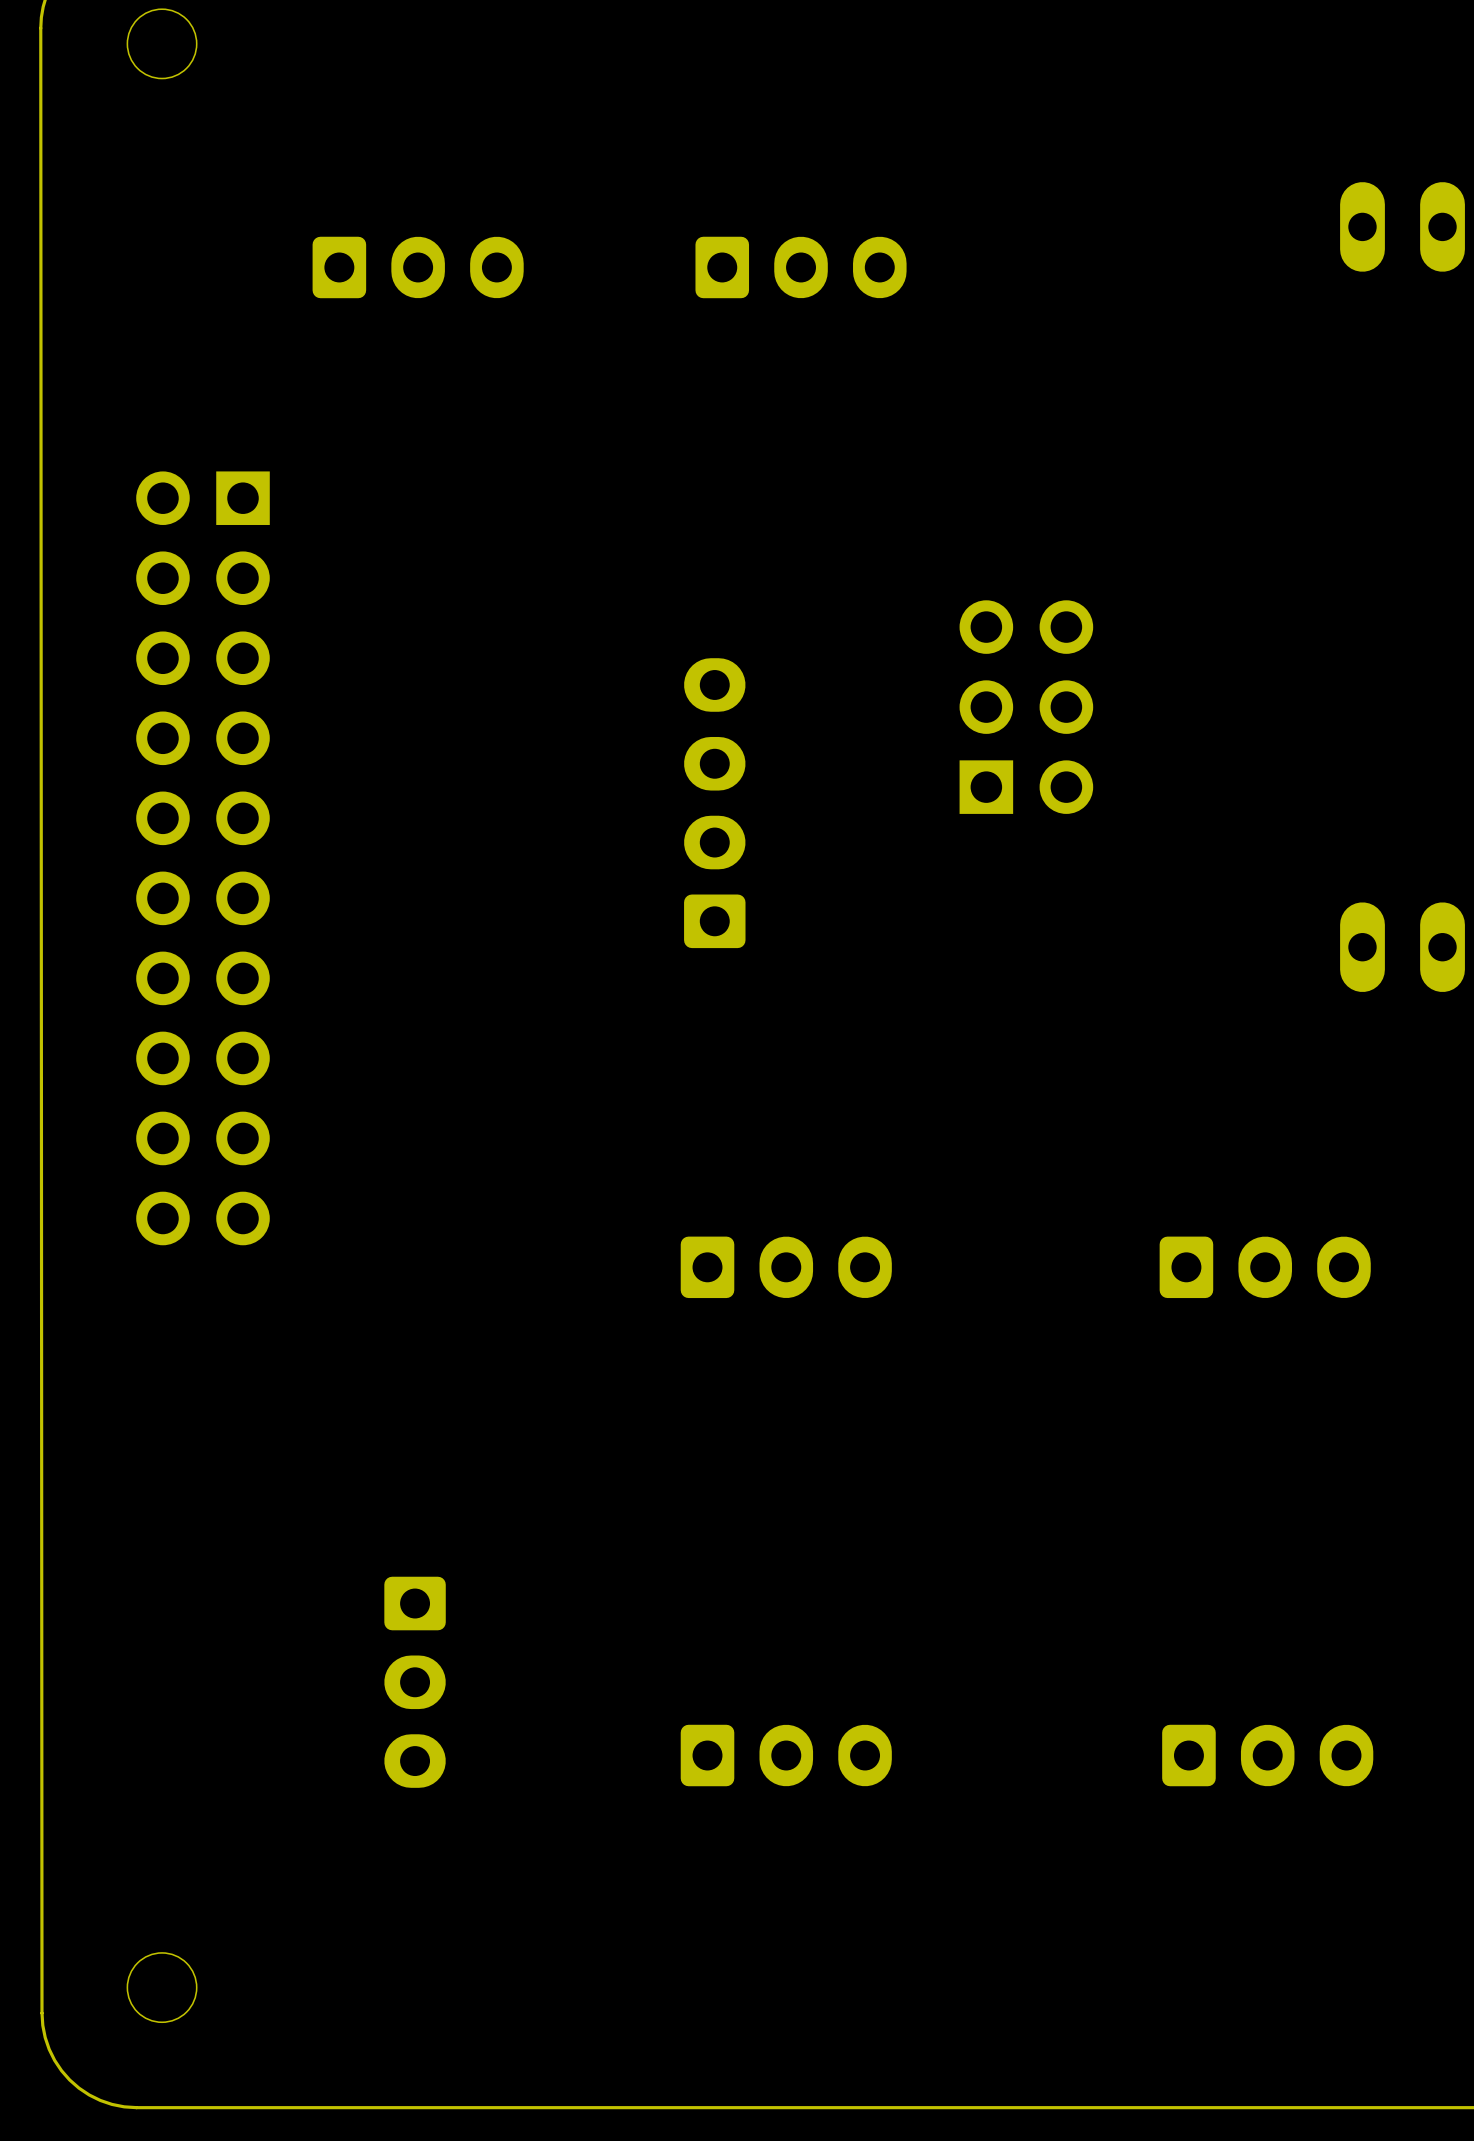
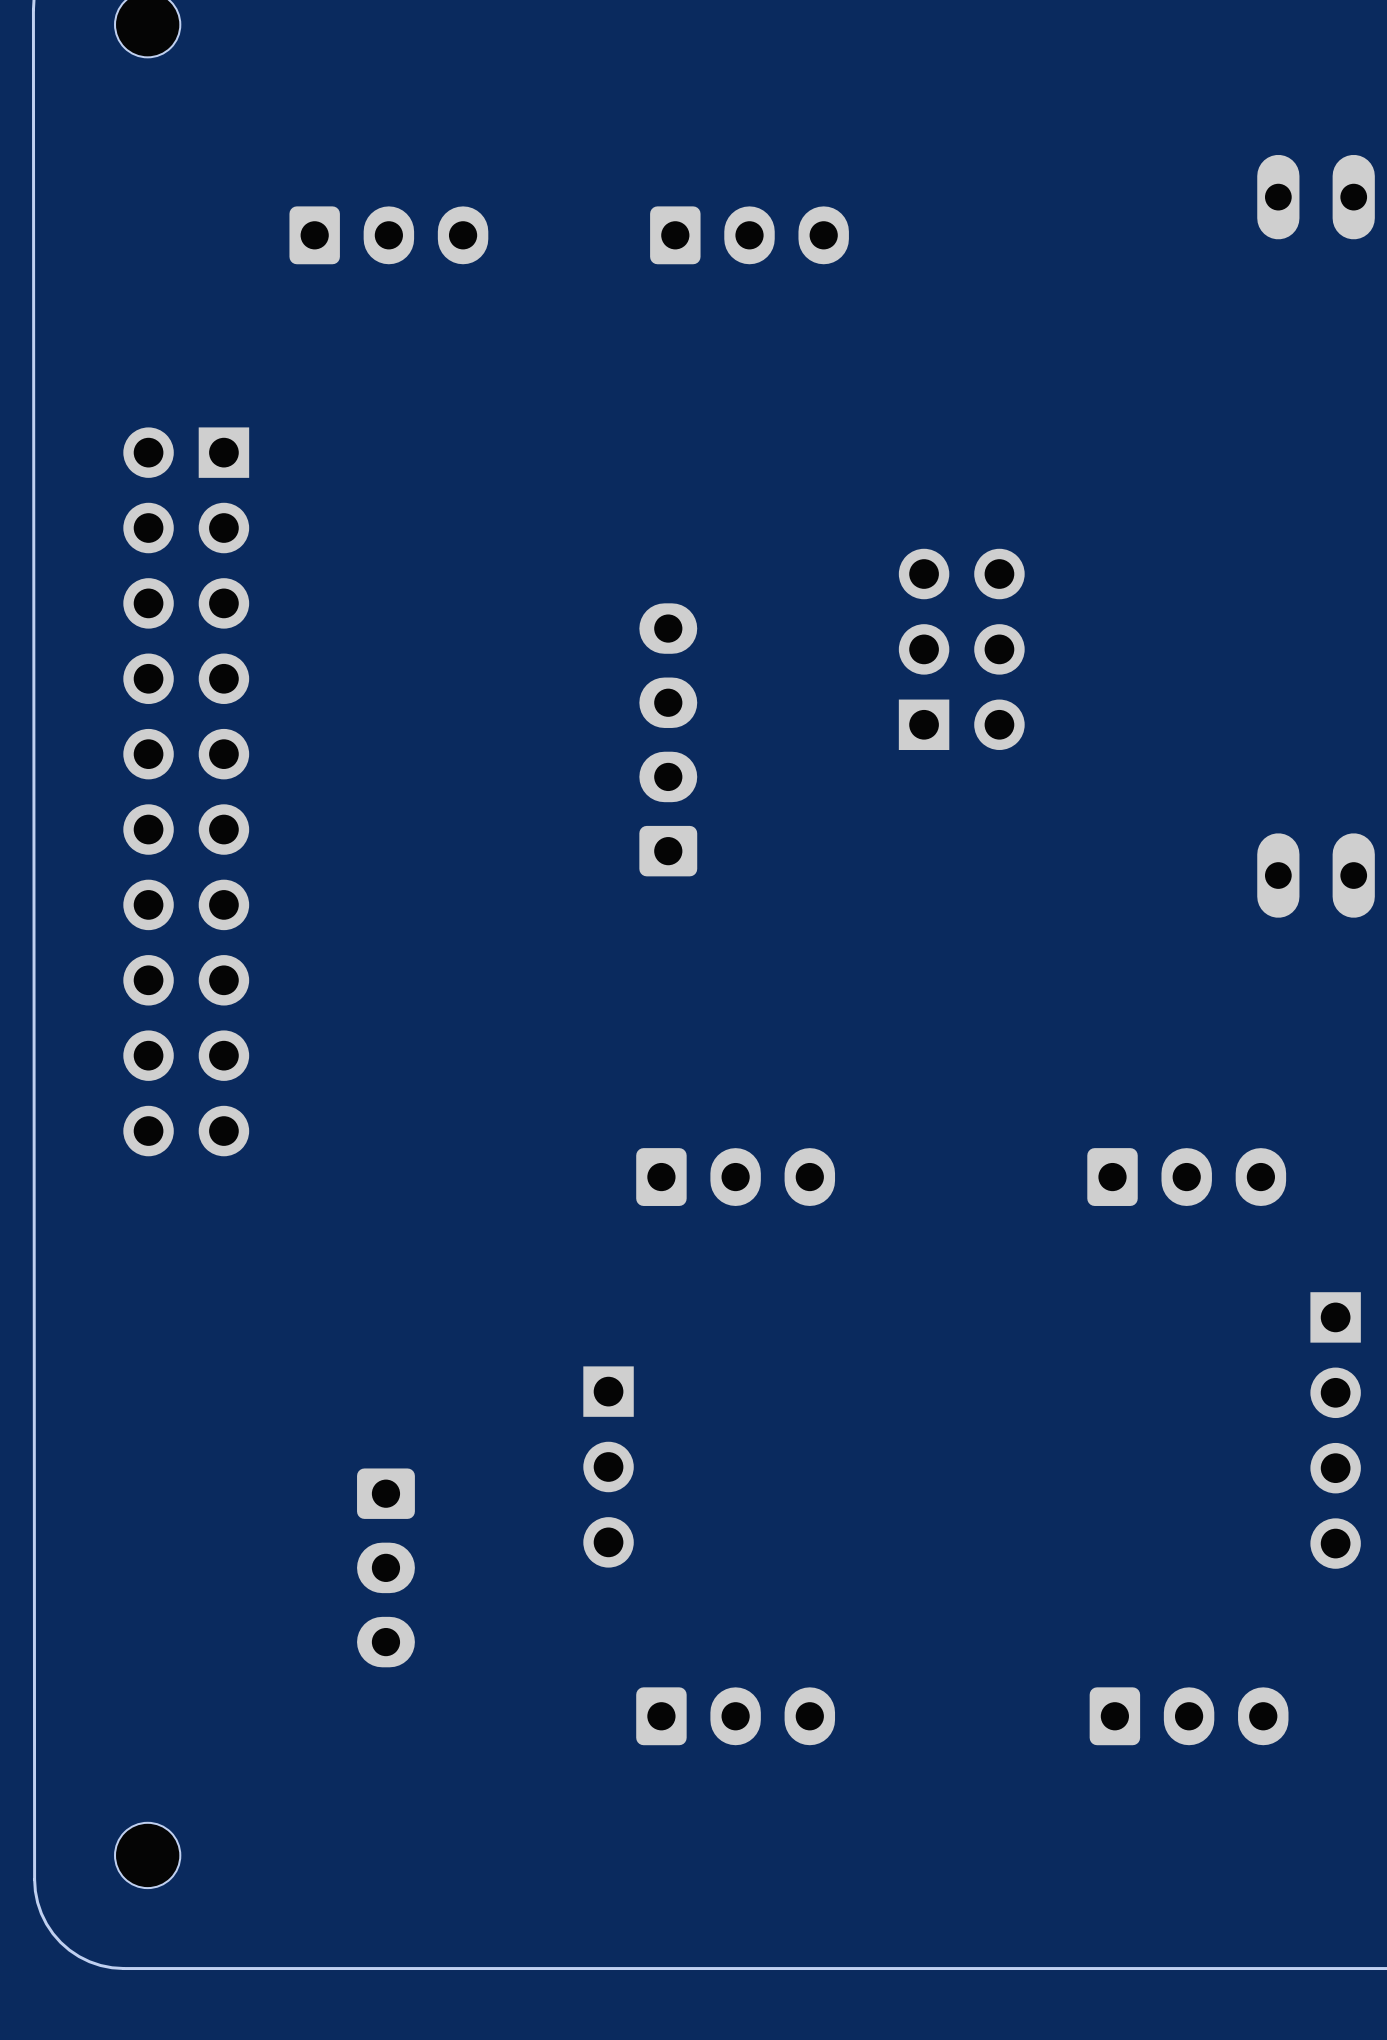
part: none -> (1335, 1430)
part: none -> (608, 1466)
part position: (786, 1755) -> (735, 1716)
part position: (1267, 1755) -> (1189, 1716)

